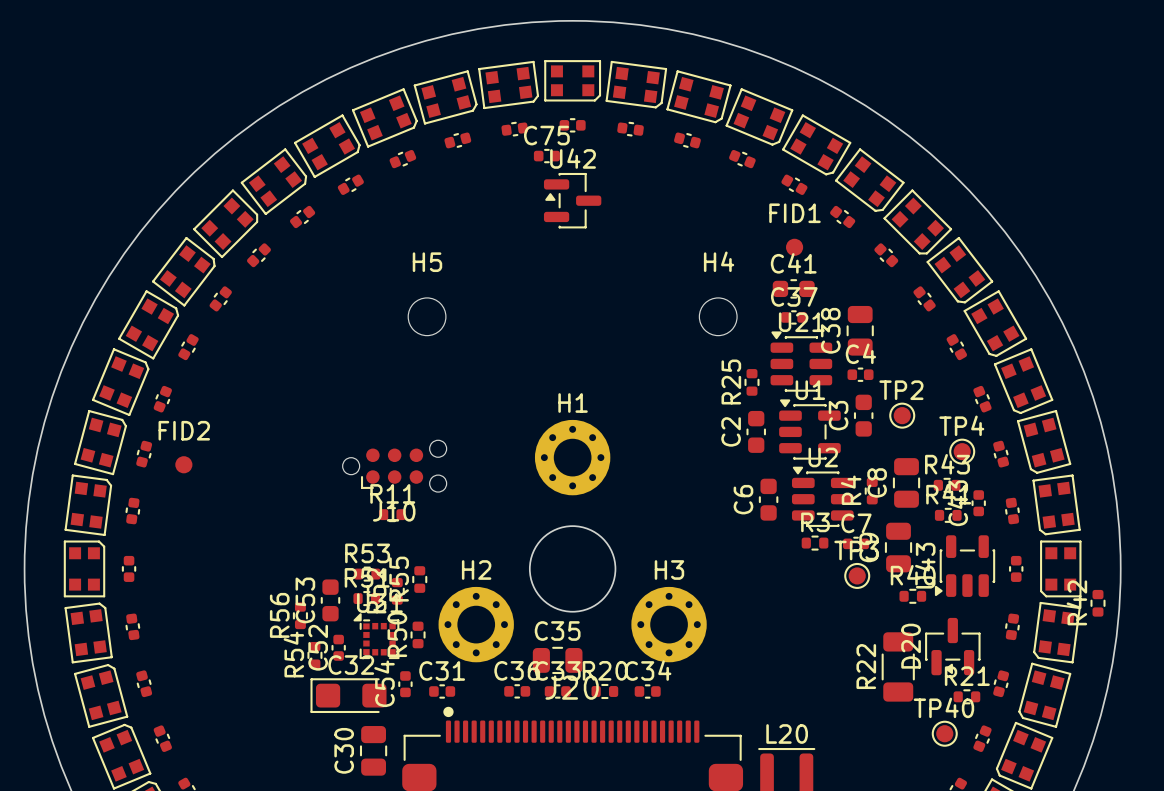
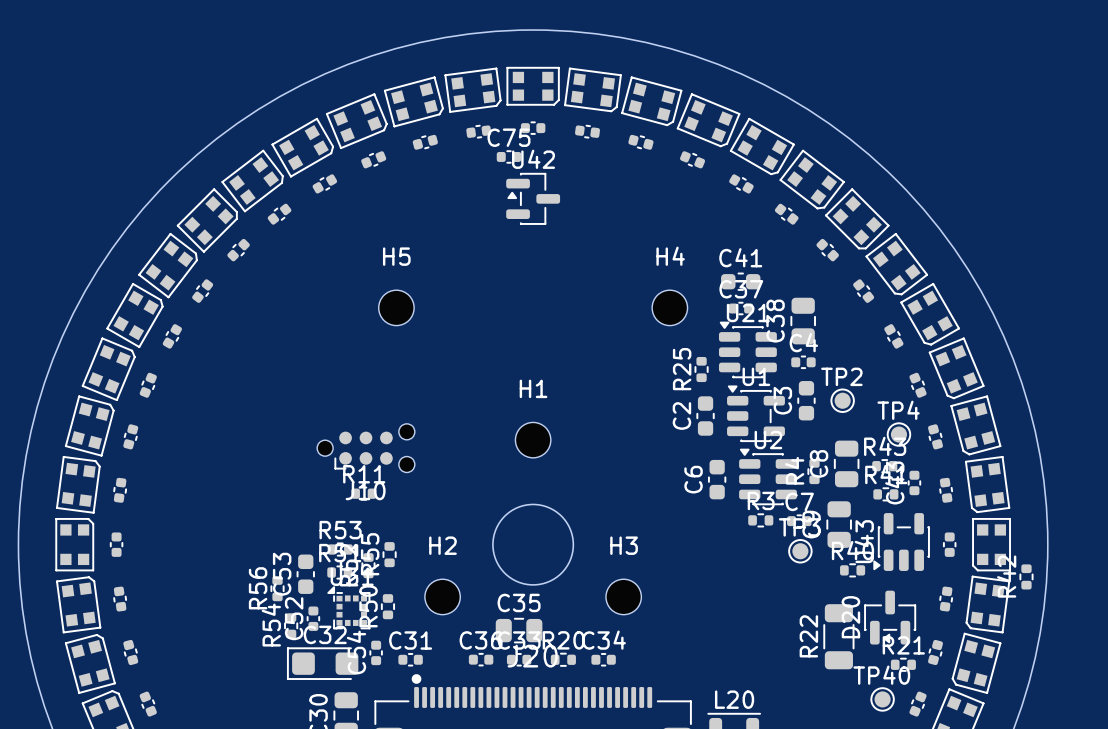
FID1: (794, 247) -> none
H1 footprint: [534, 419, 611, 496] -> [515, 422, 551, 458]
FID2: (183, 464) -> none
H2 footprint: [438, 586, 514, 663] -> [424, 579, 461, 615]
H3 footprint: [631, 586, 707, 663] -> [605, 579, 642, 615]

